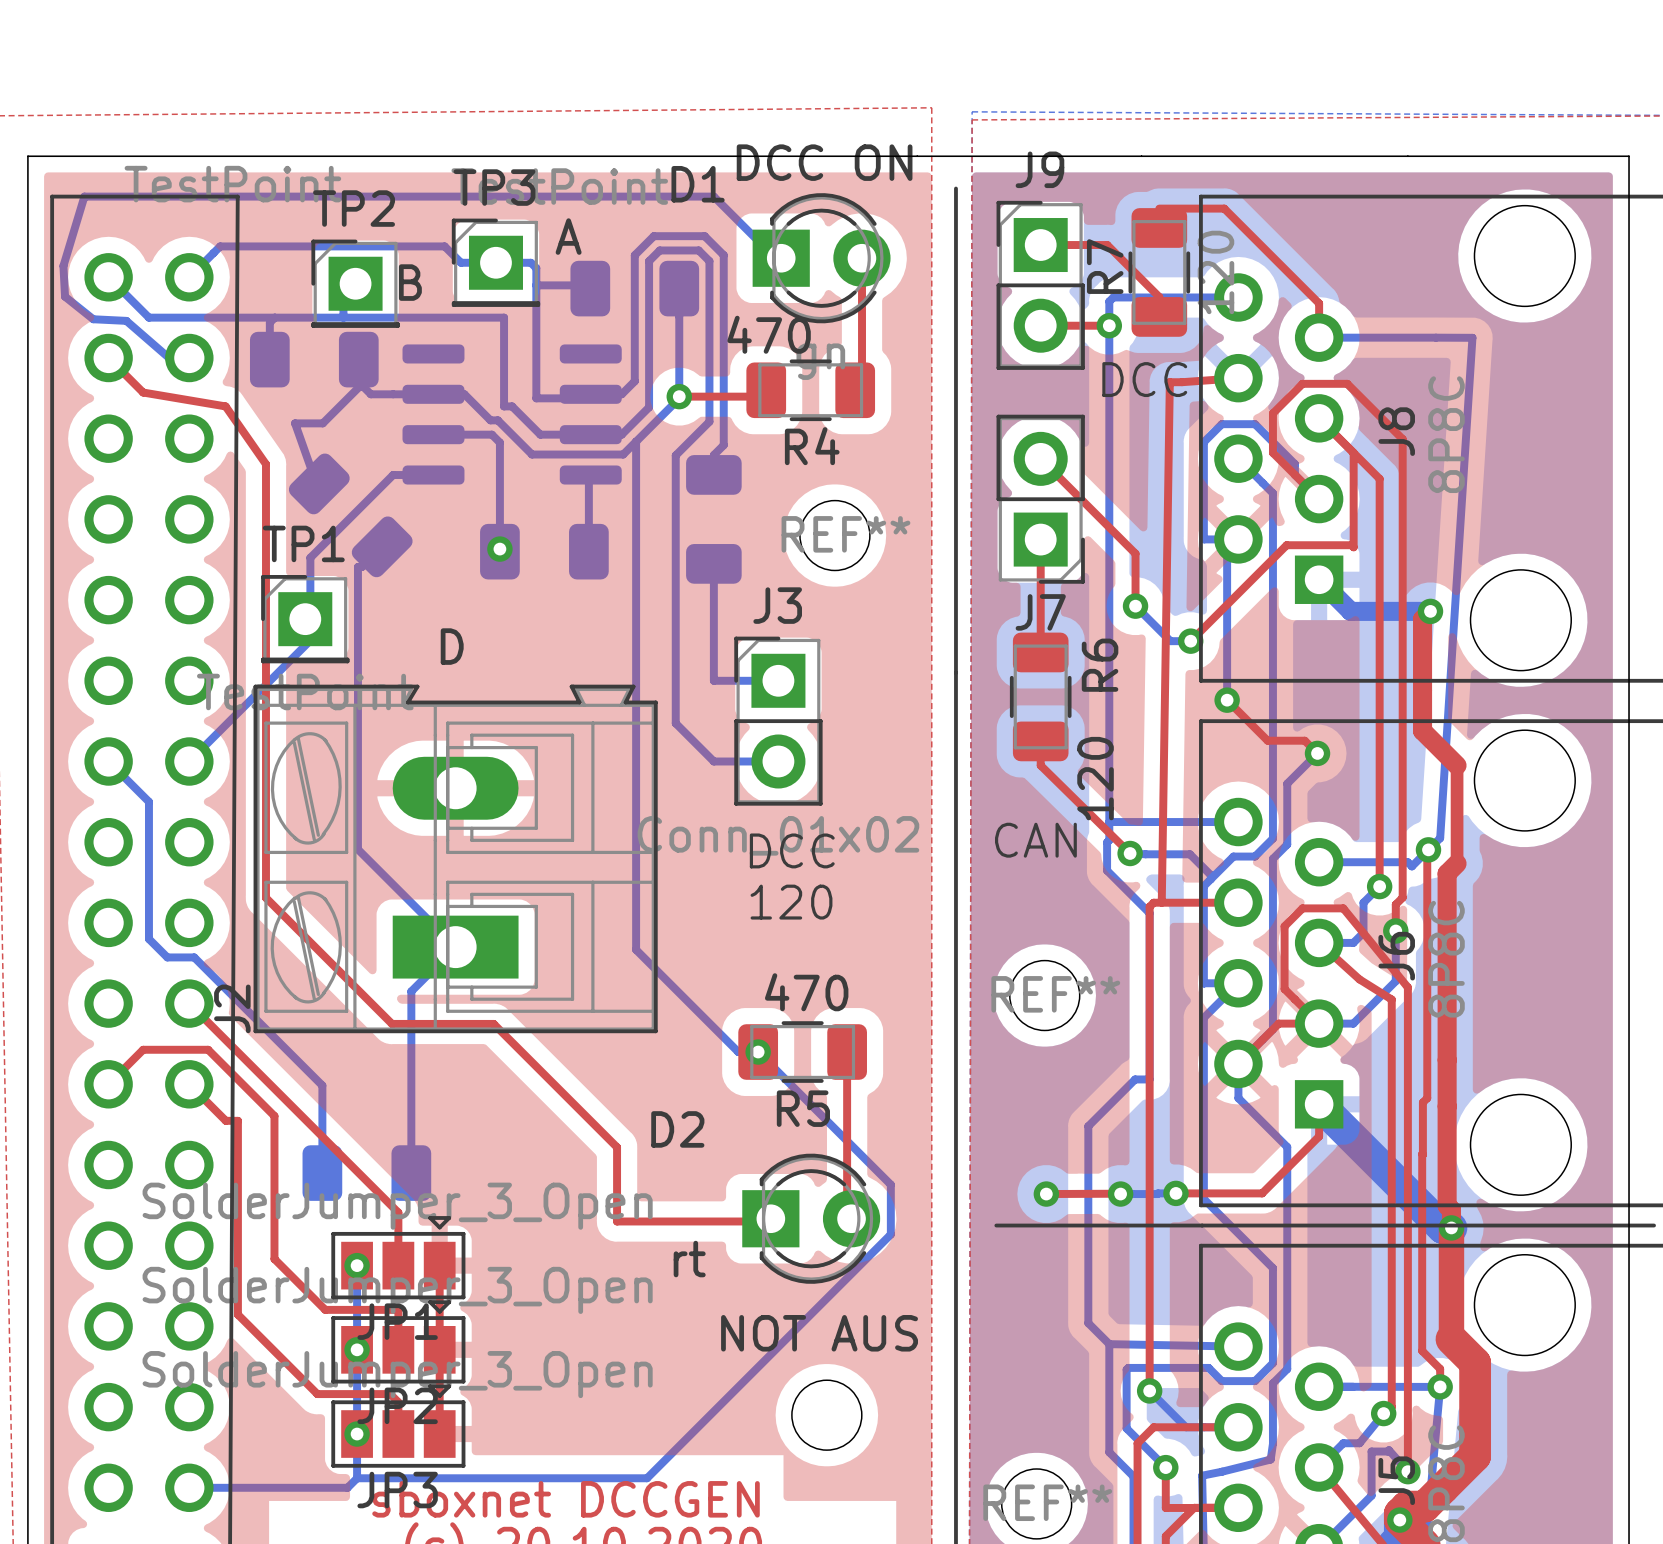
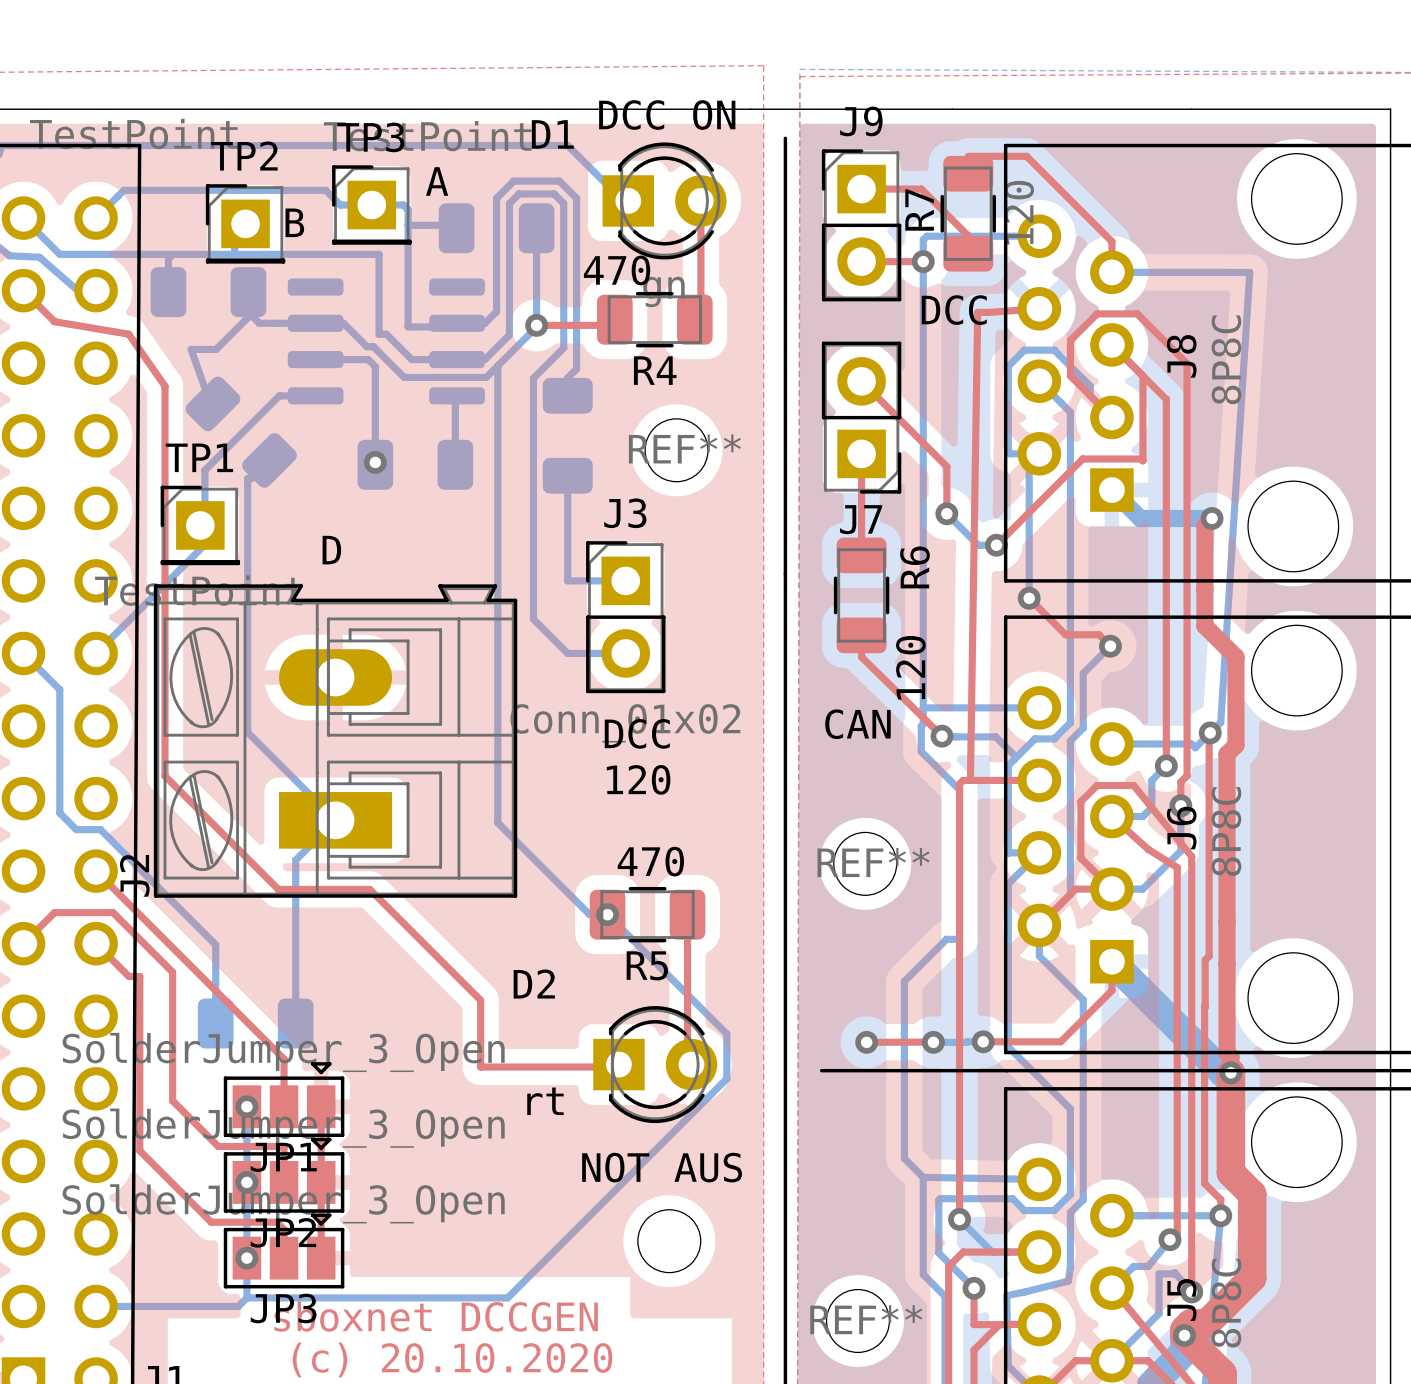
top track width: thin (1457, 765) (1457, 863) -> thick (1235, 657) (1235, 745)
top track width: thin (1451, 1227) (1451, 1339) -> thick (1230, 1072) (1230, 1172)

